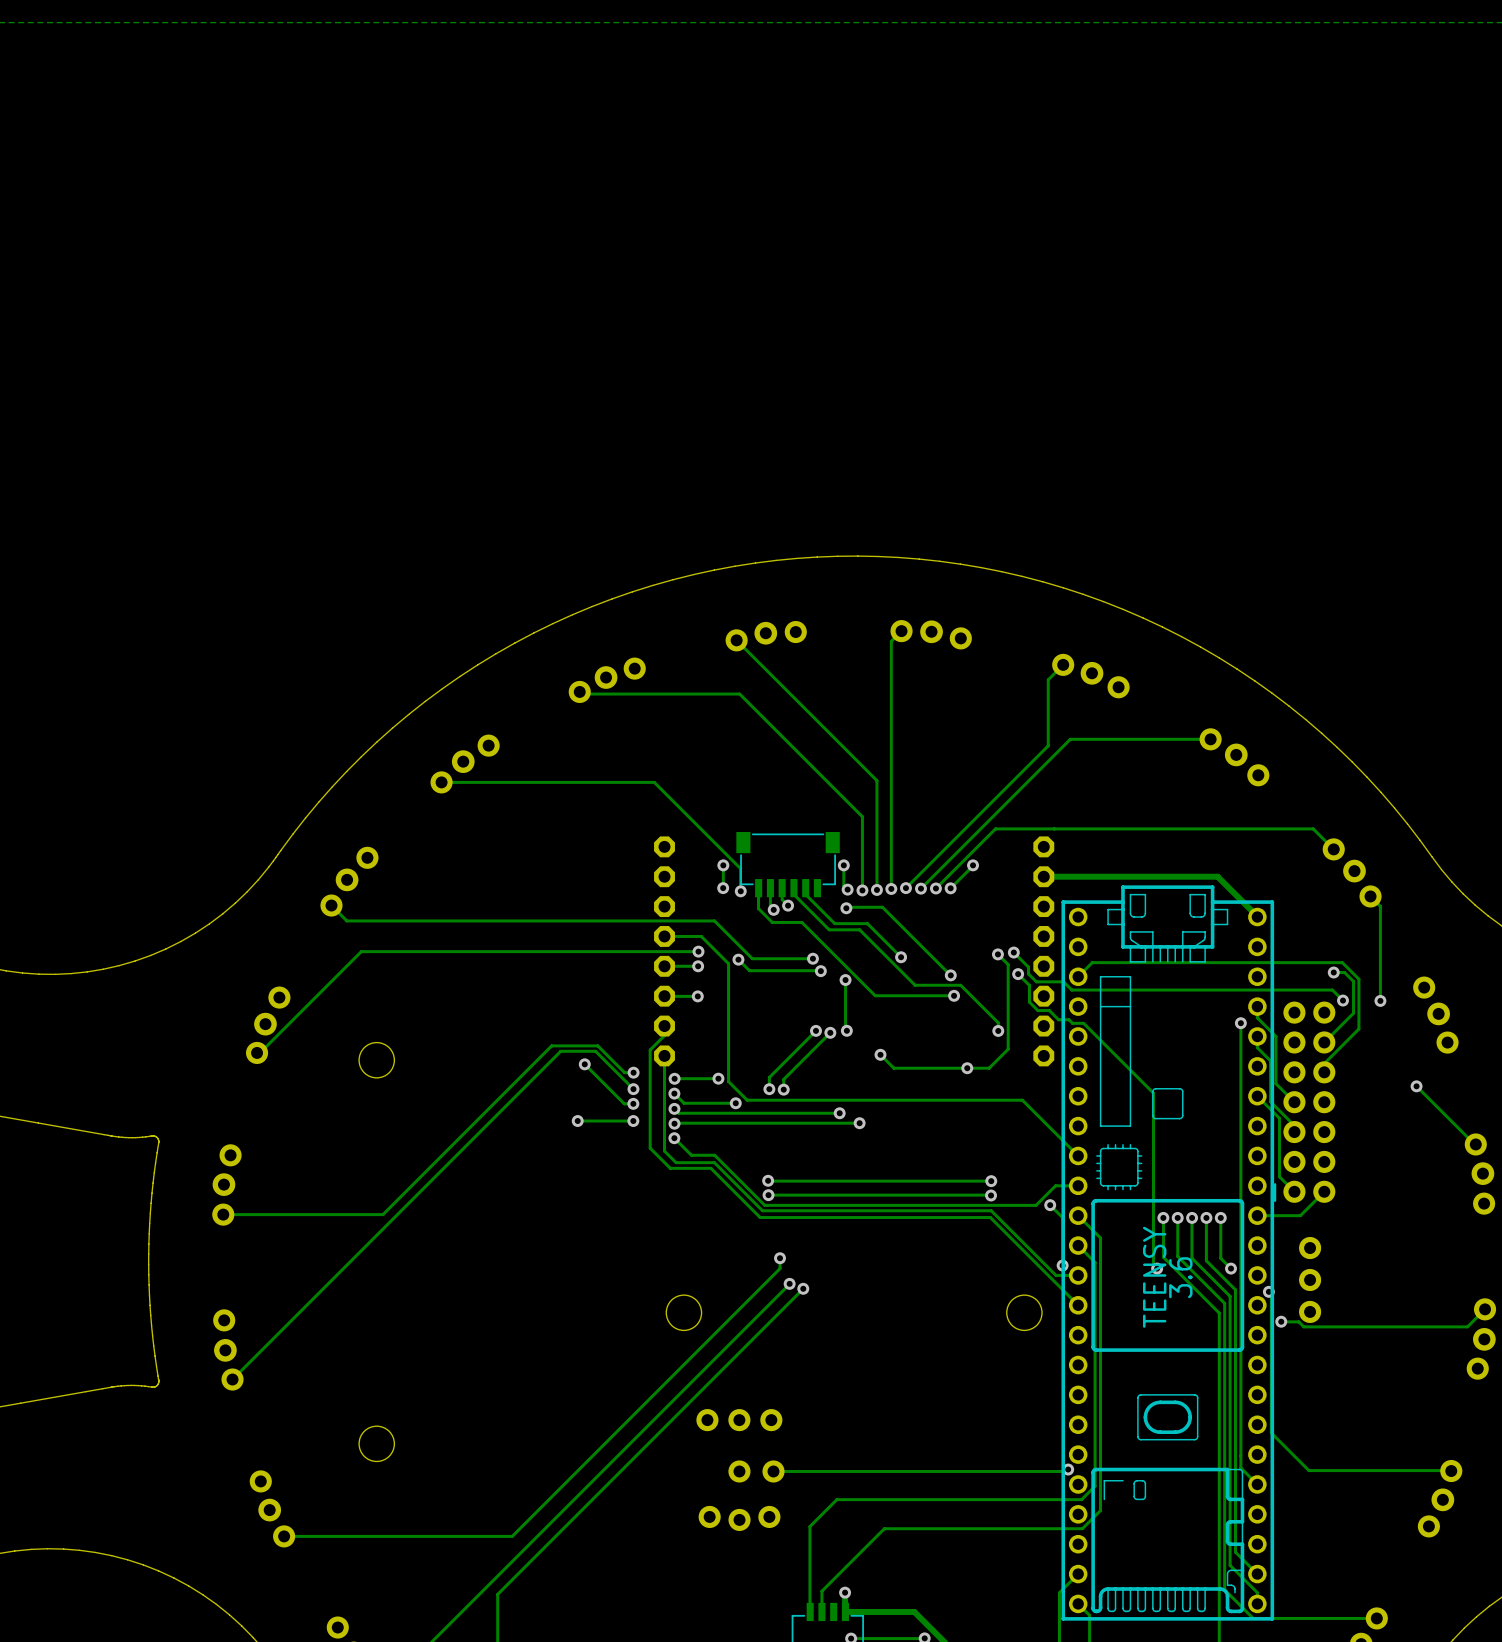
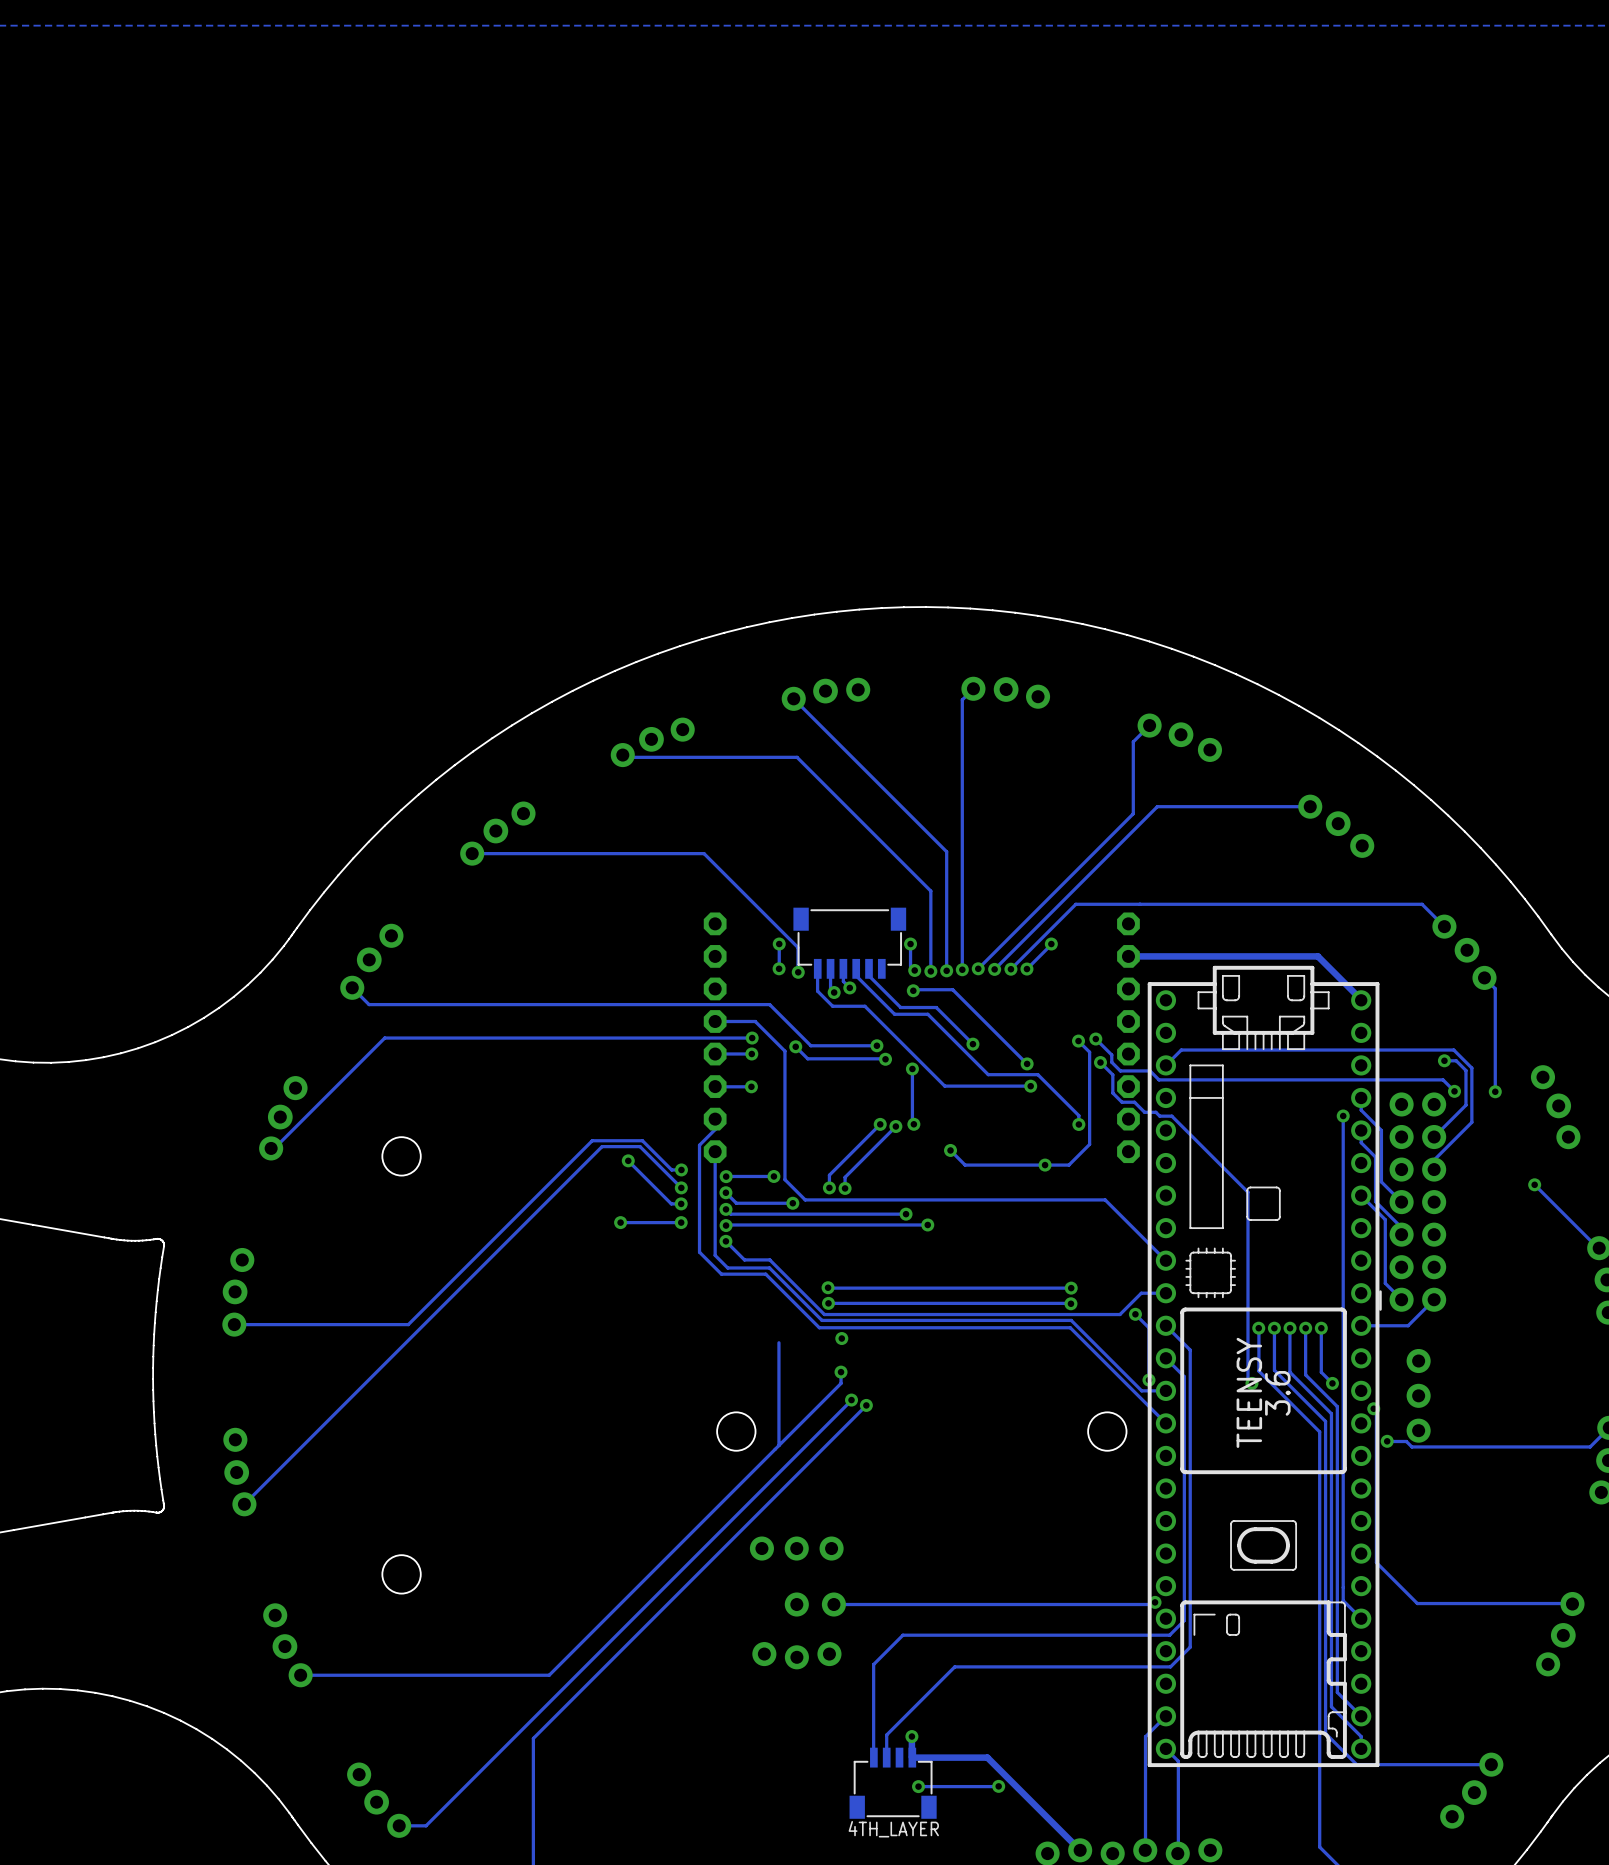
via: none -> (841, 1338)
track: none -> (778, 1342) (778, 1445)

